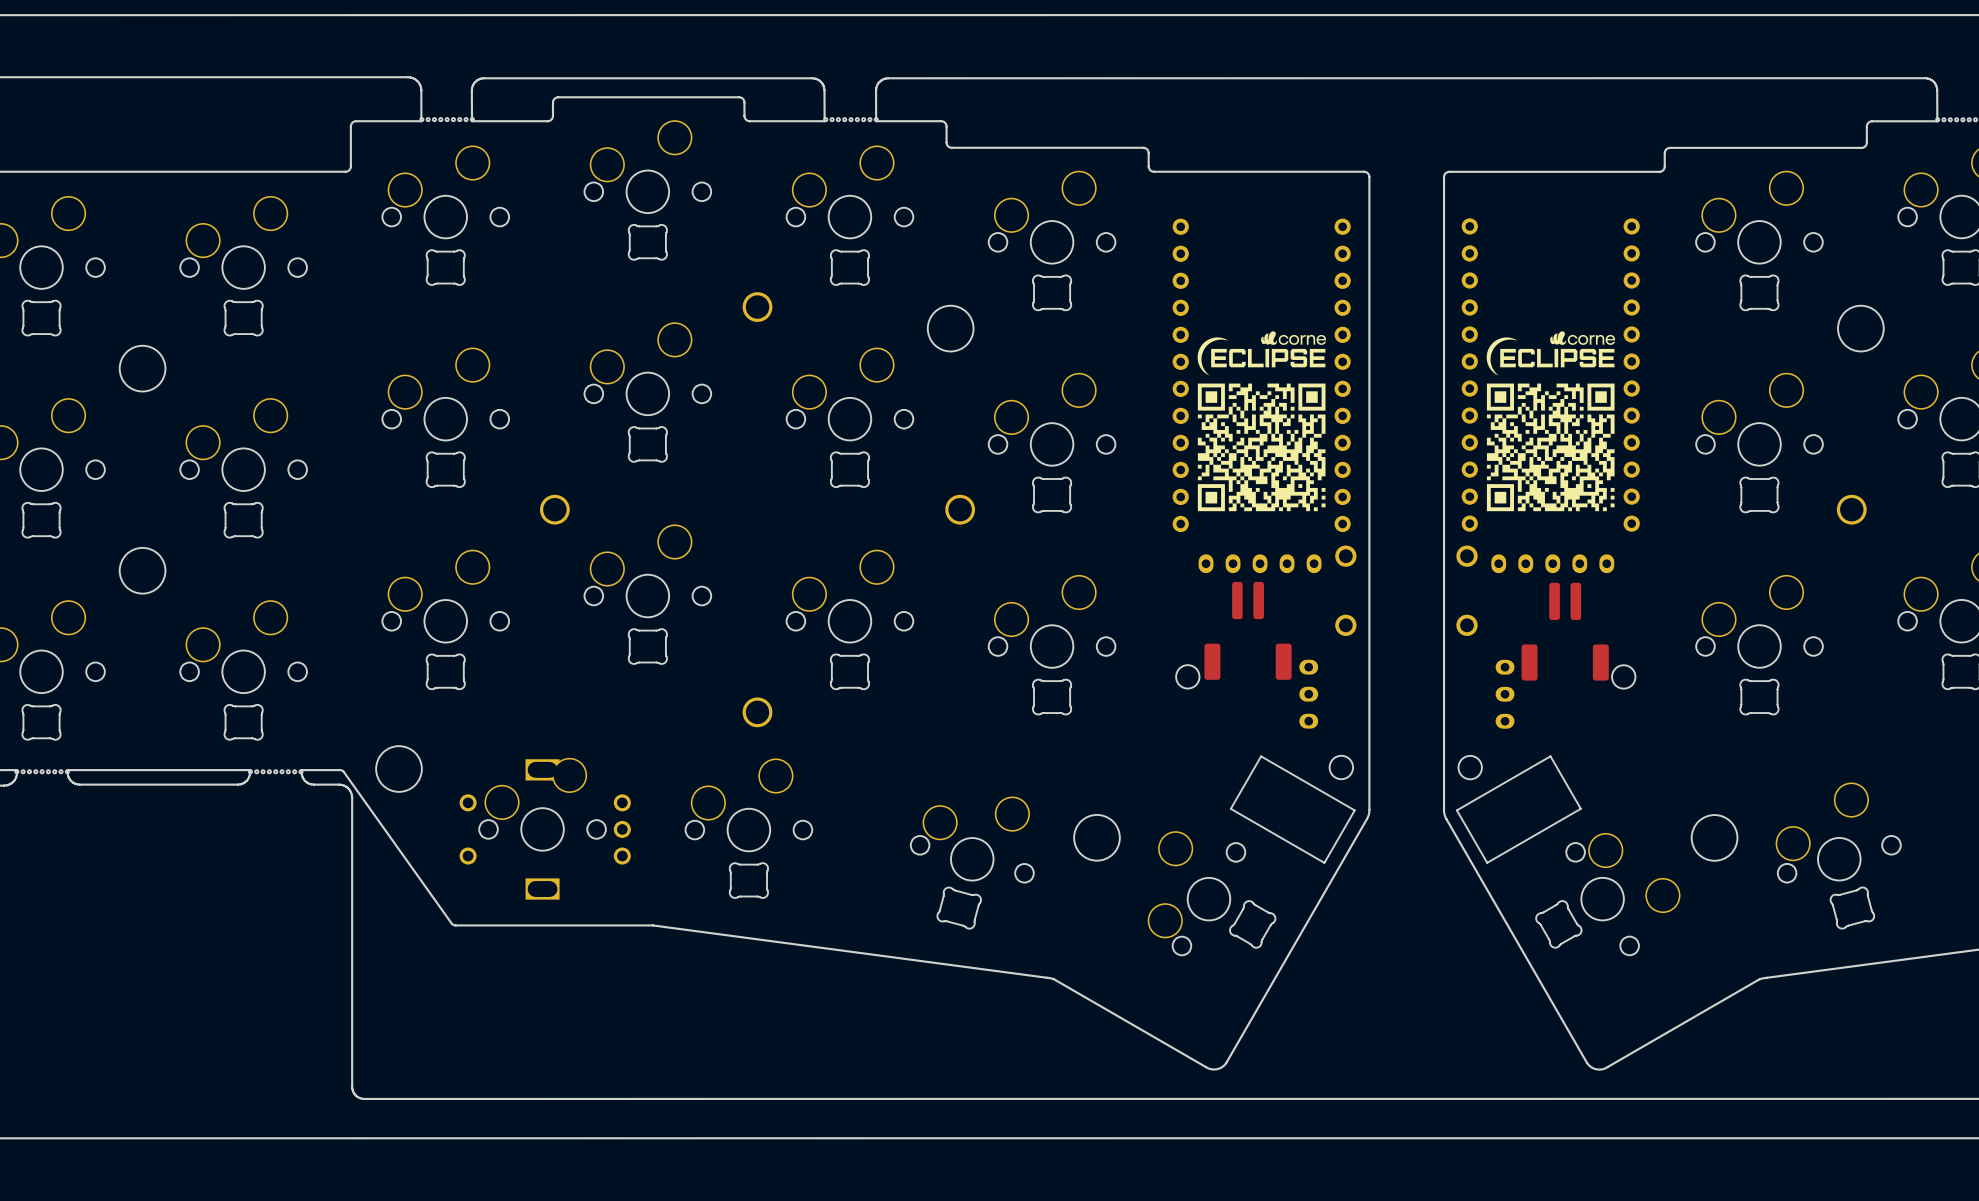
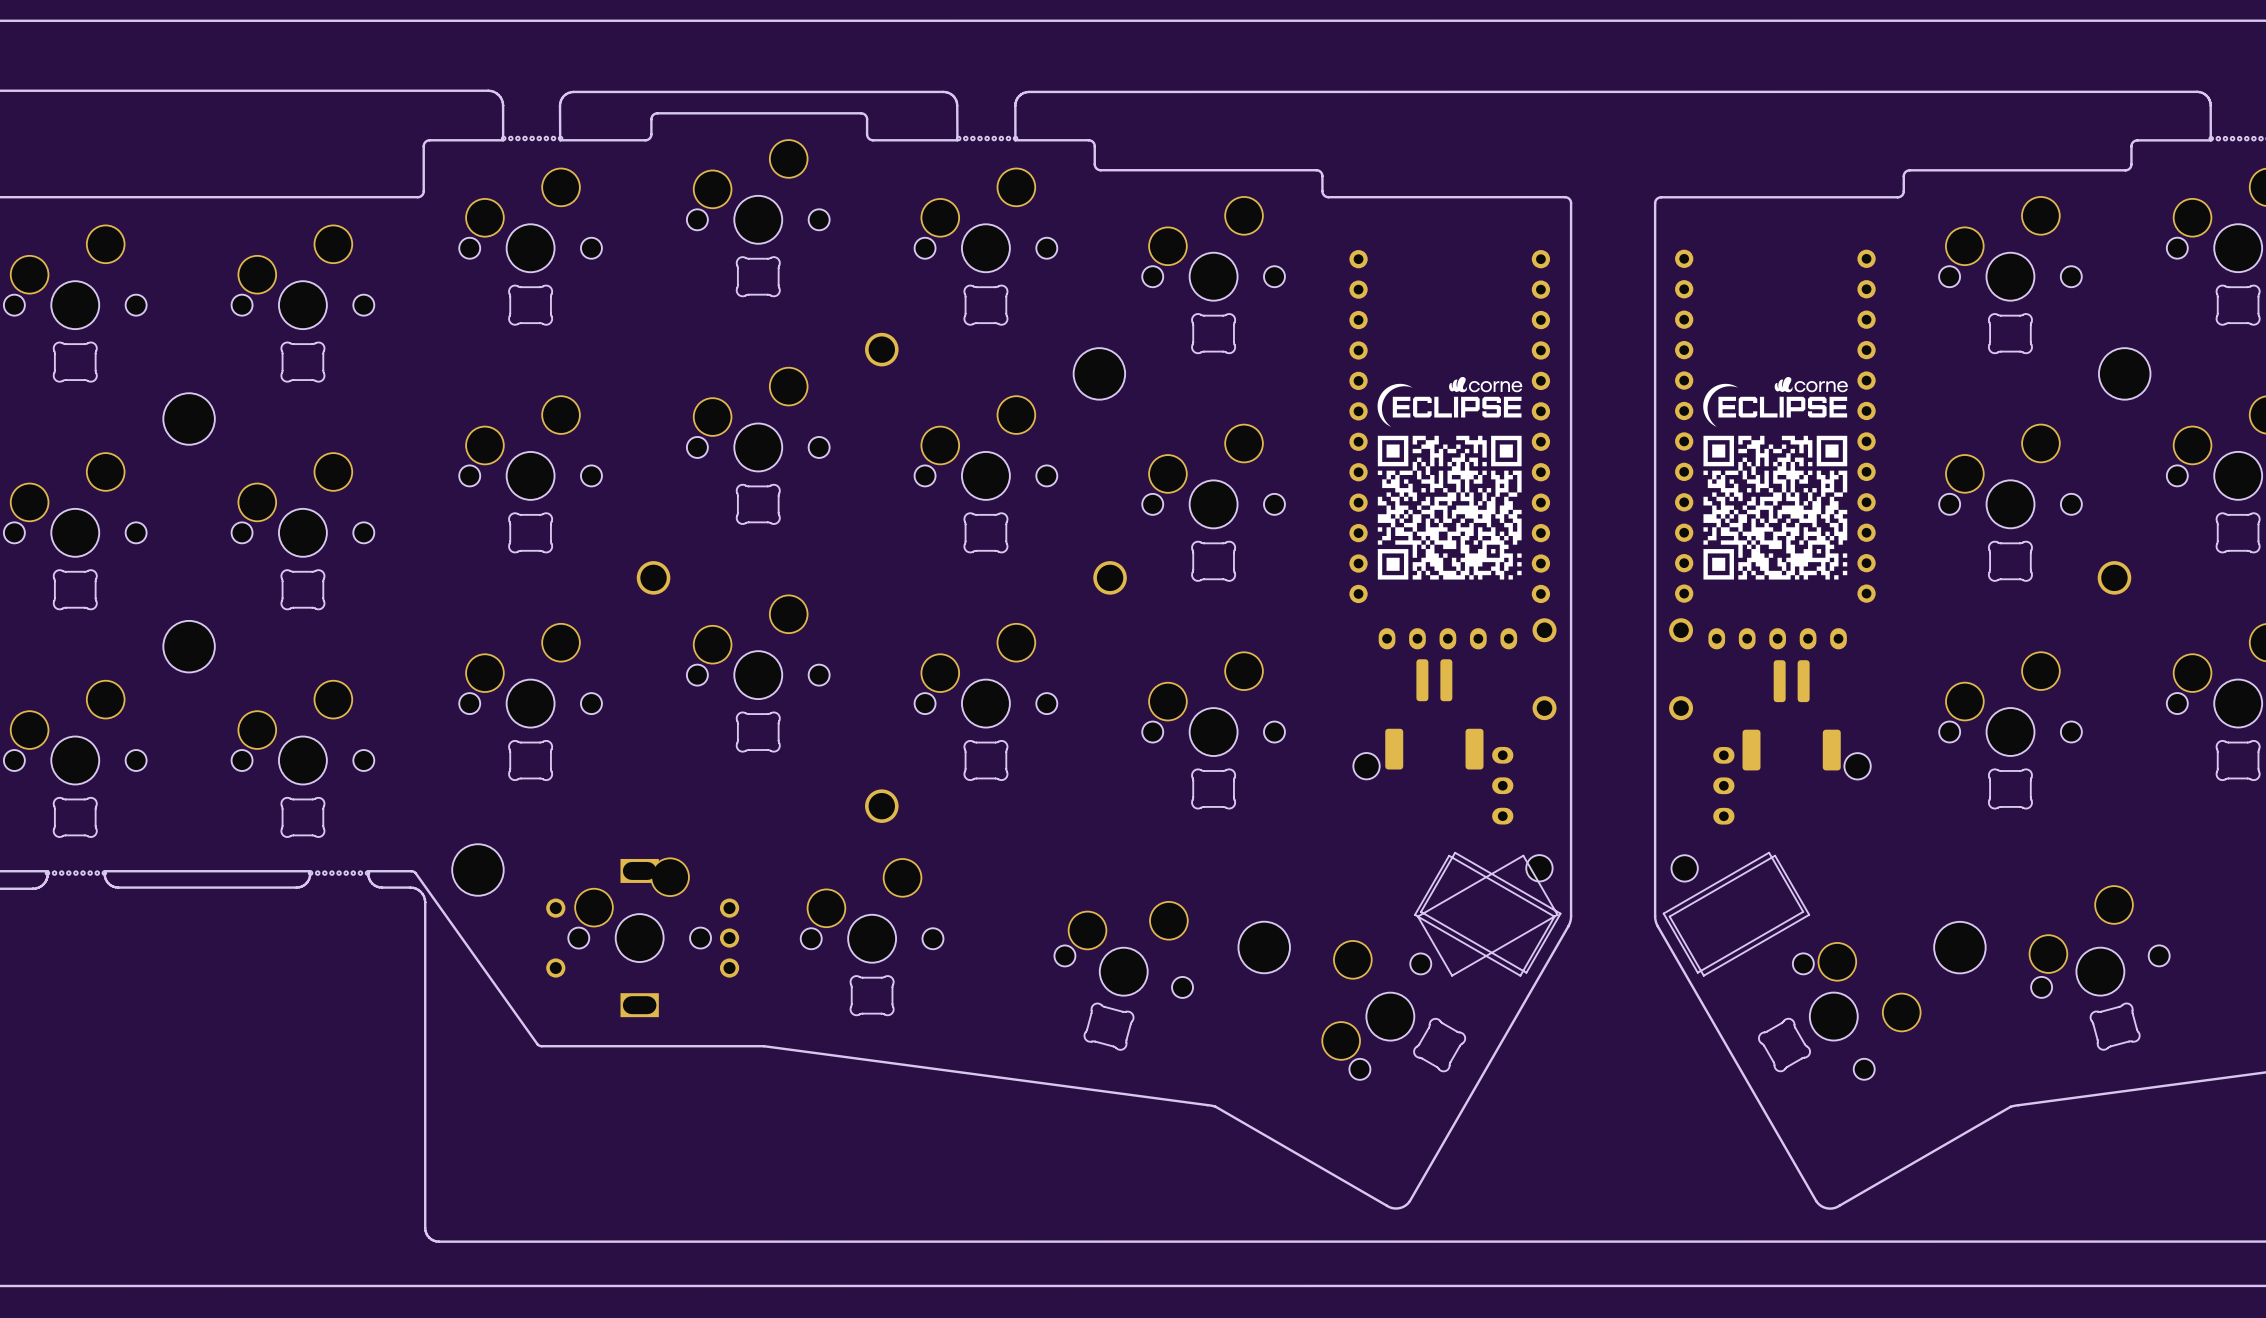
drawing shape: [1230, 755, 1356, 864] -> [1420, 852, 1561, 974]
drawing shape: [1456, 755, 1582, 864] -> [1663, 852, 1804, 974]
board edge: none -> (1449, 855) (1554, 916) (1520, 975) (1414, 914) (1449, 855)
board edge: none -> (1523, 855) (1557, 914) (1452, 975) (1417, 916) (1523, 855)
board edge: none -> (1775, 855) (1809, 914) (1703, 975) (1669, 916) (1775, 855)

